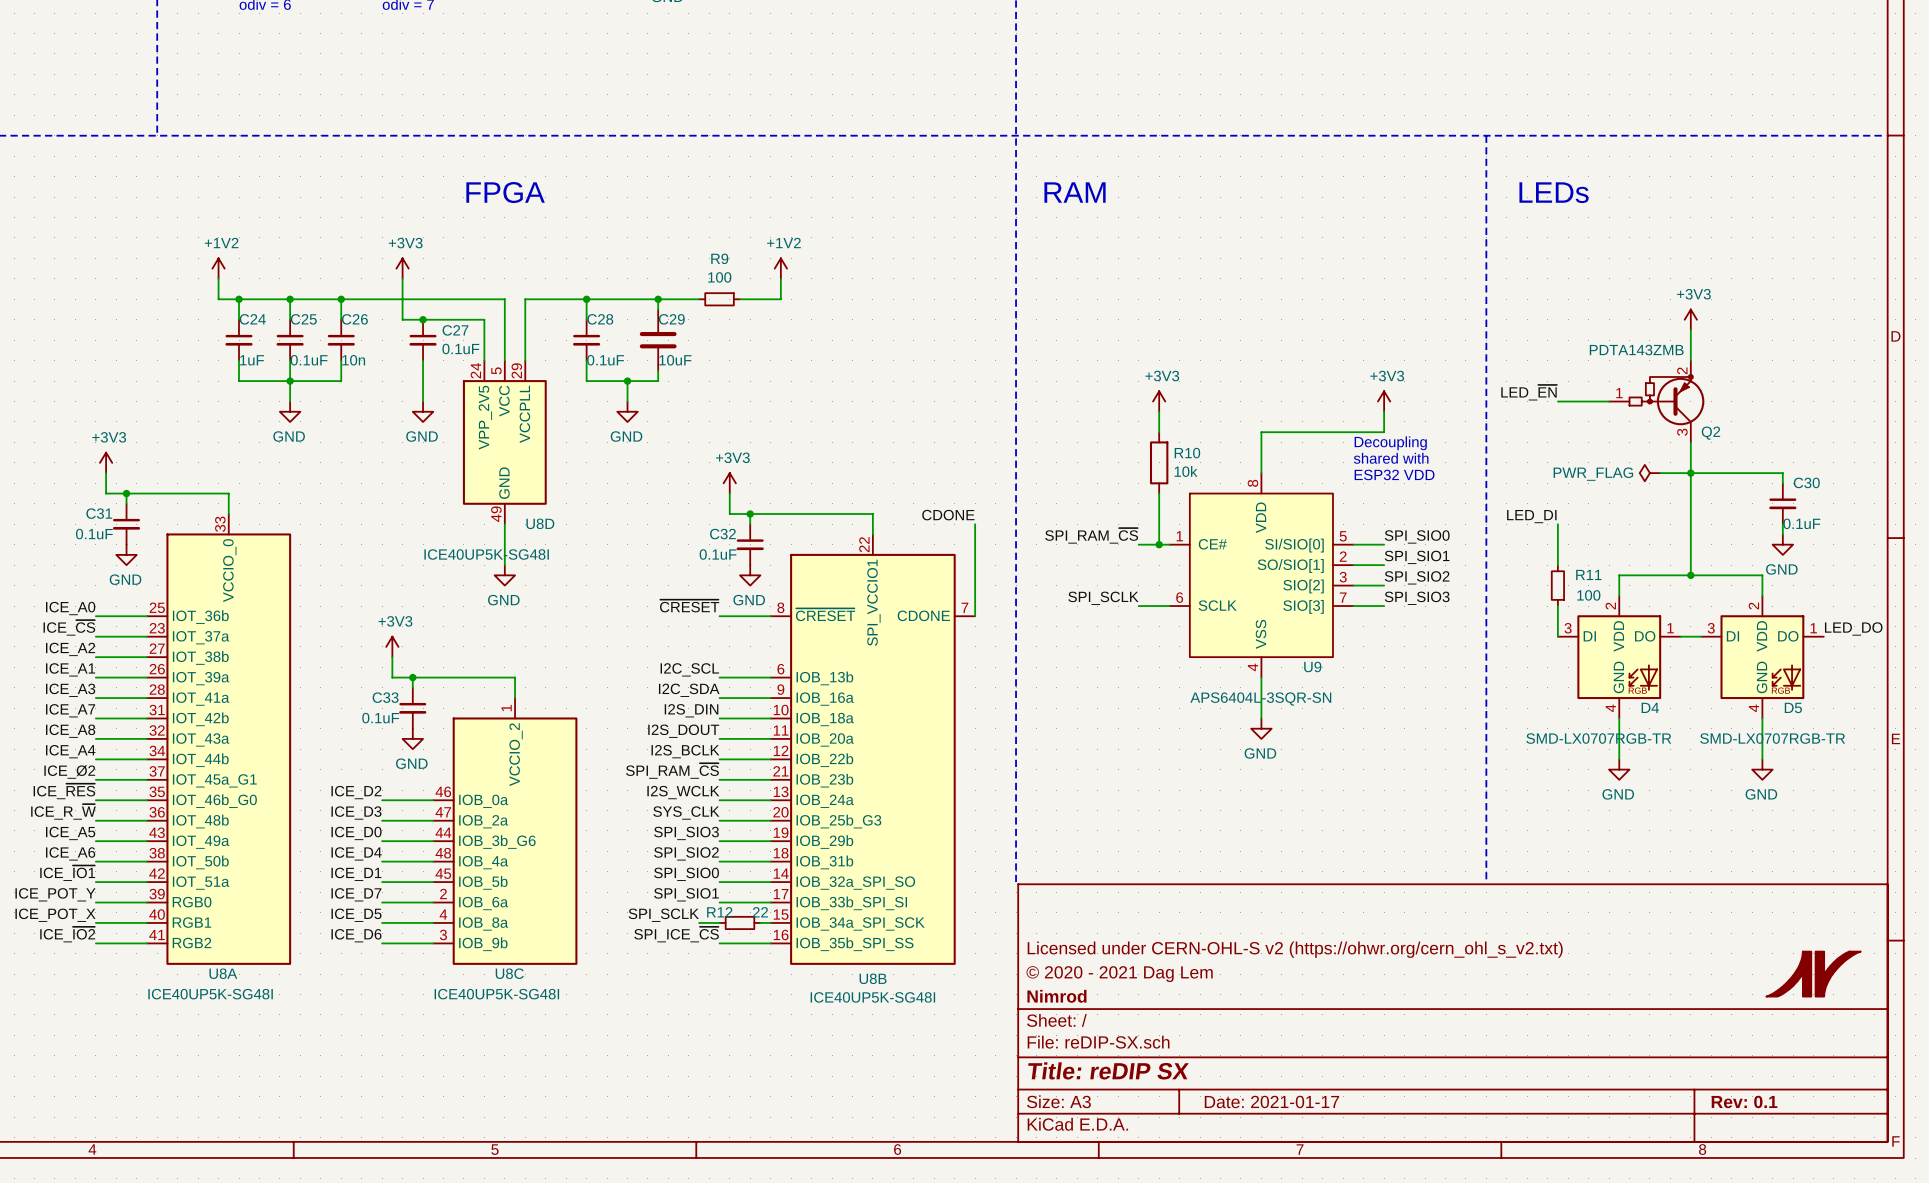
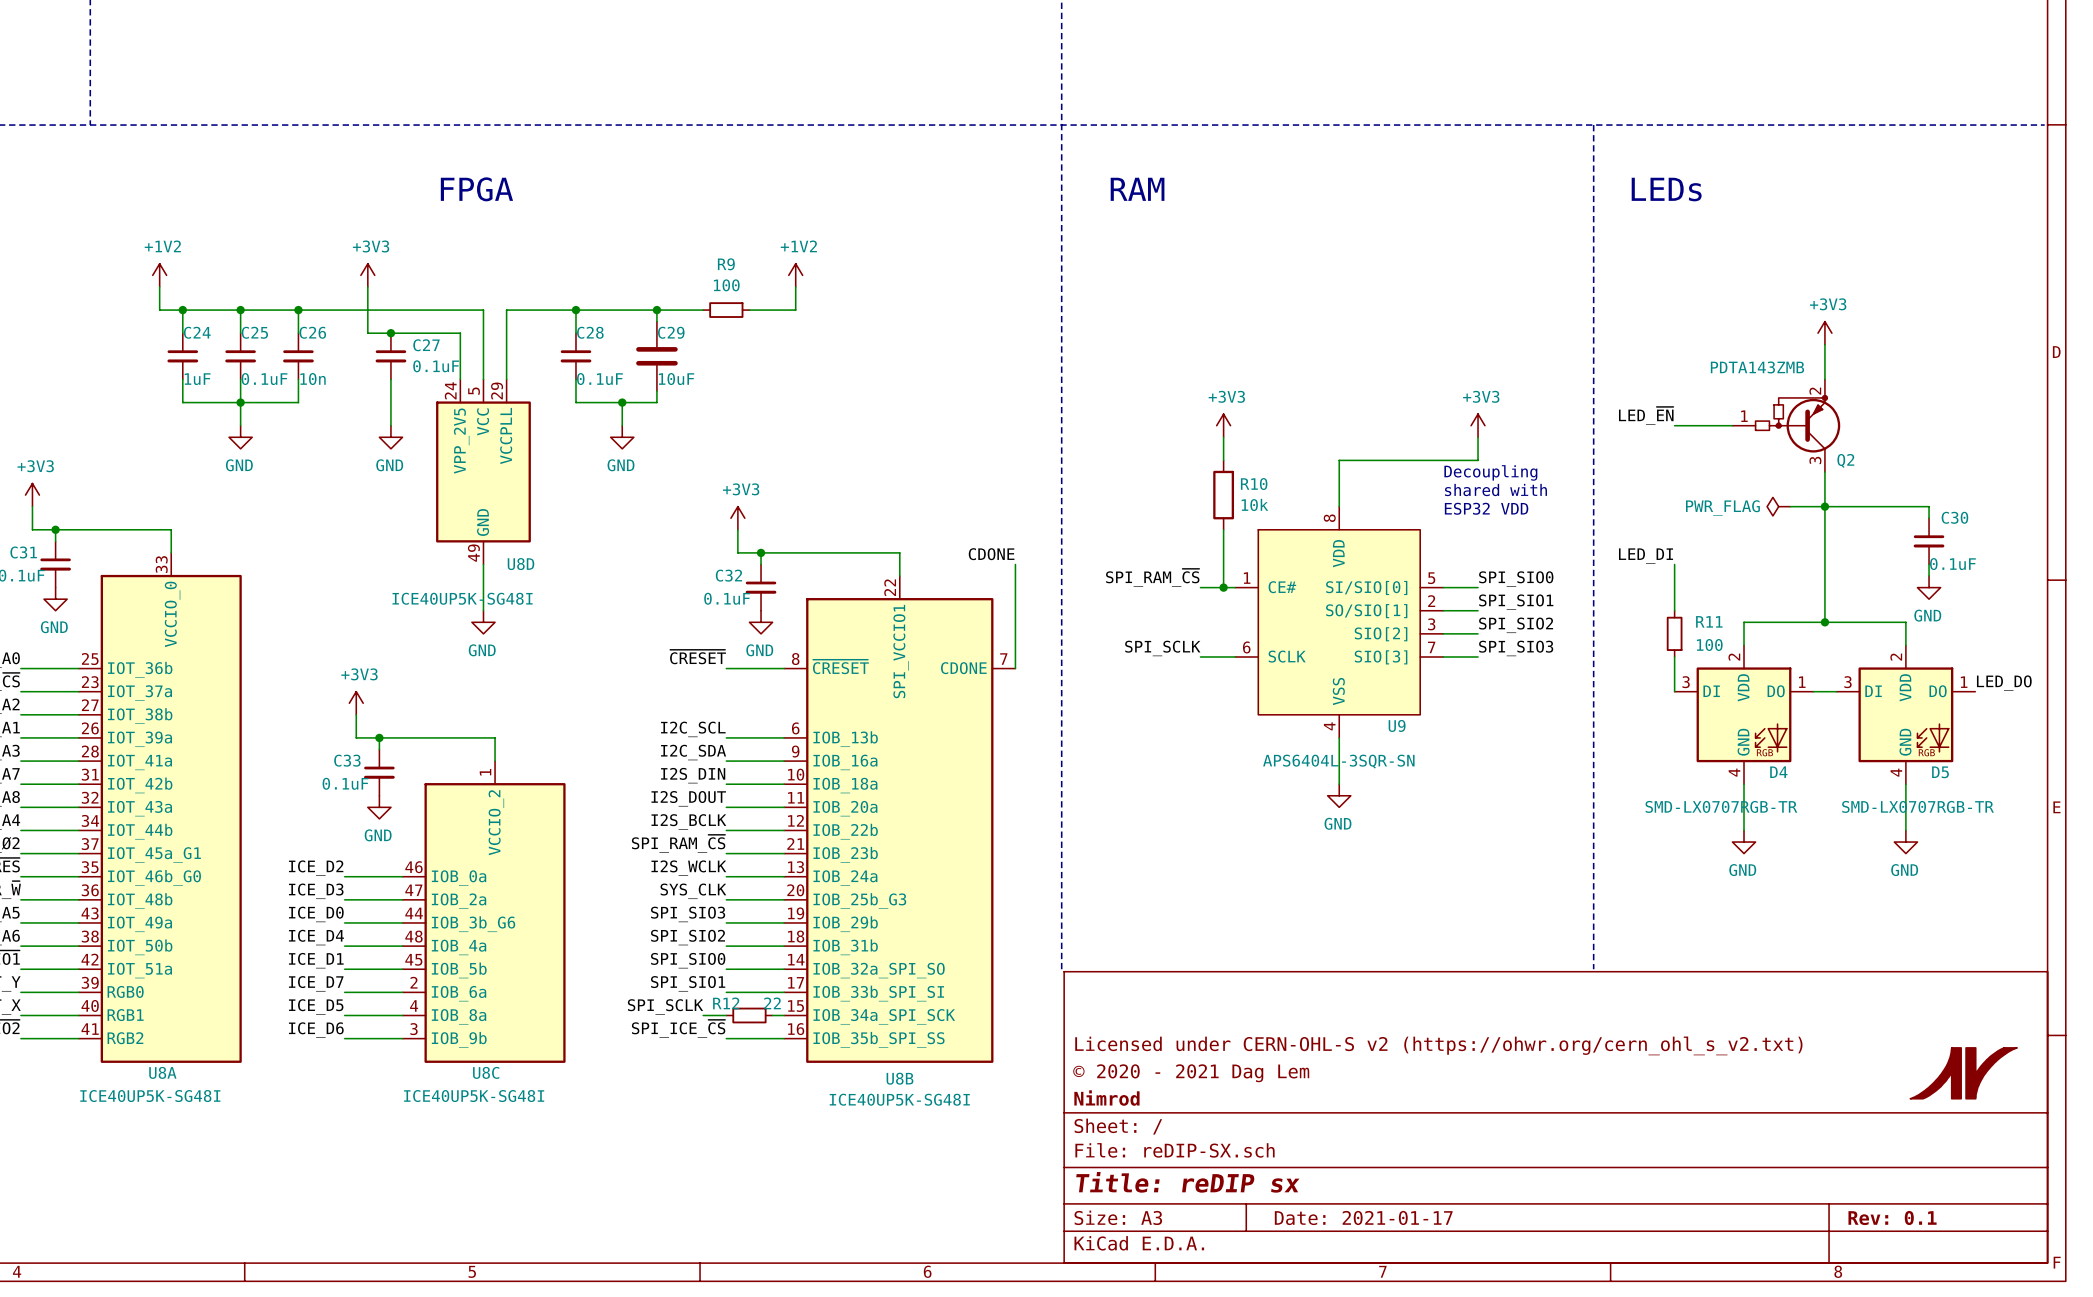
title block: Title: reDIP SX (1108, 1070) -> Title: reDIP sx (1187, 1182)

